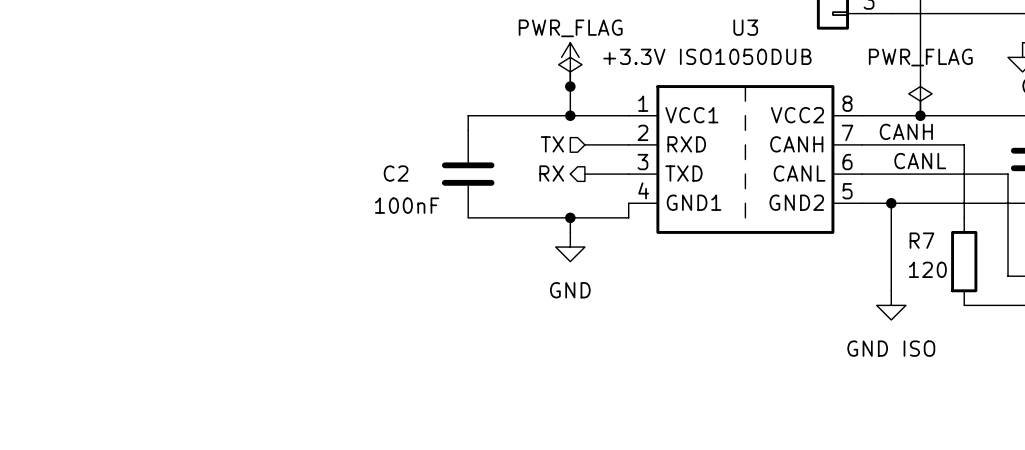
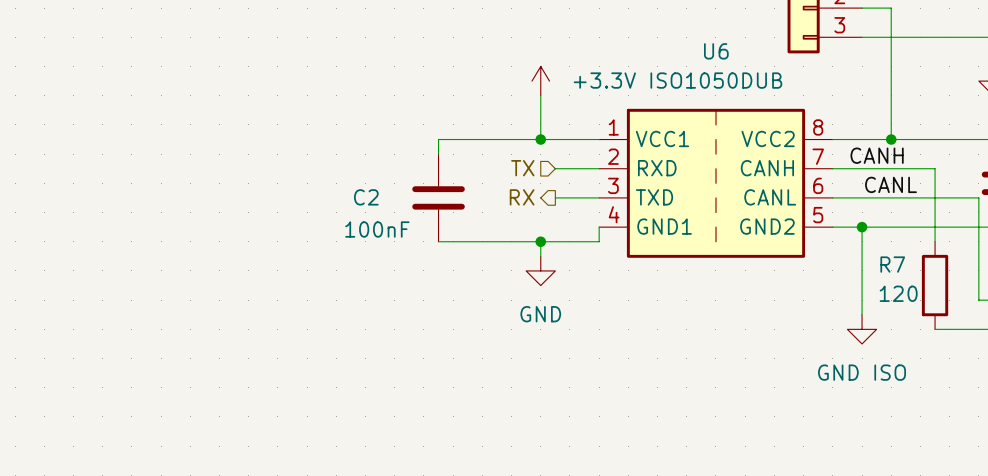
U3 name: U3 (745, 27) -> U6 (716, 51)
power symbol: PWR_FLAG (570, 71) -> none
junction: (570, 86) -> none
power symbol: PWR_FLAG (920, 101) -> none

